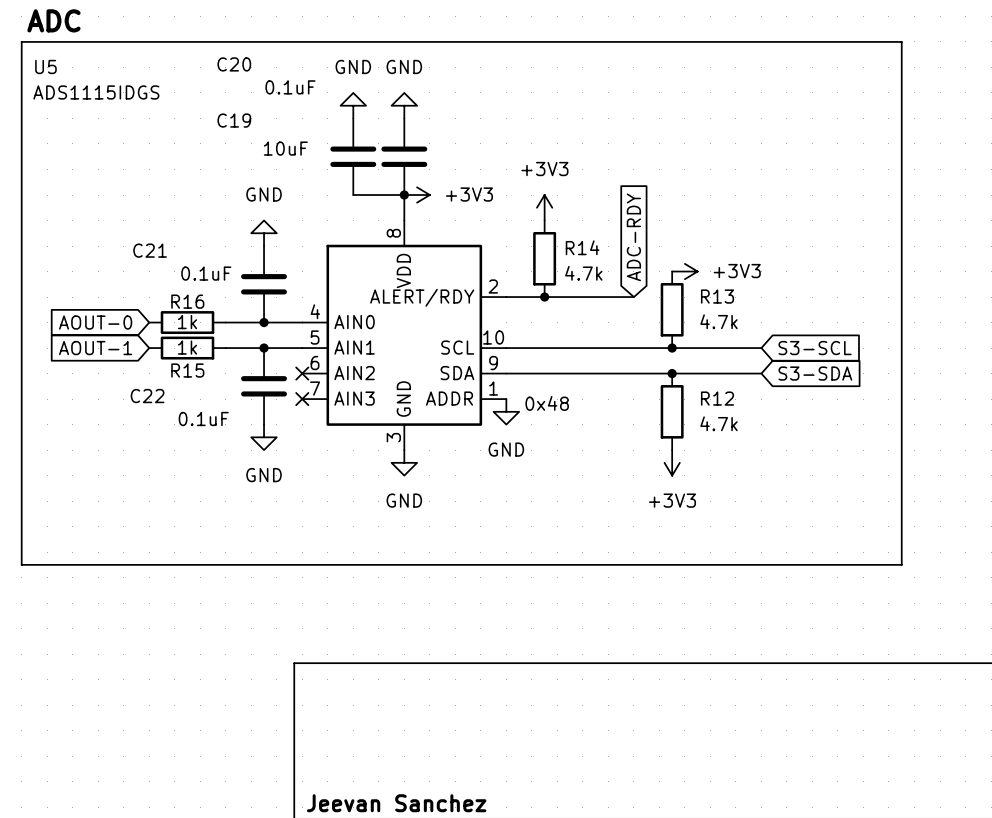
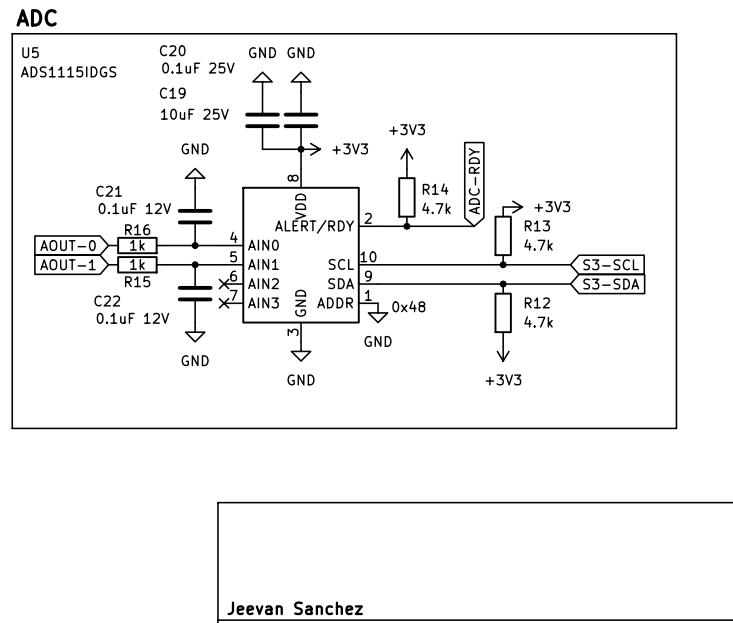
C20 value: 0.1uF (290, 87) -> 0.1uF 25V (198, 68)
C19 value: 10uF (285, 148) -> 10uF 25V (194, 114)
C21 value: 0.1uF (206, 273) -> 0.1uF 12V (134, 208)
C22 value: 0.1uF (203, 418) -> 0.1uF 12V (132, 318)

